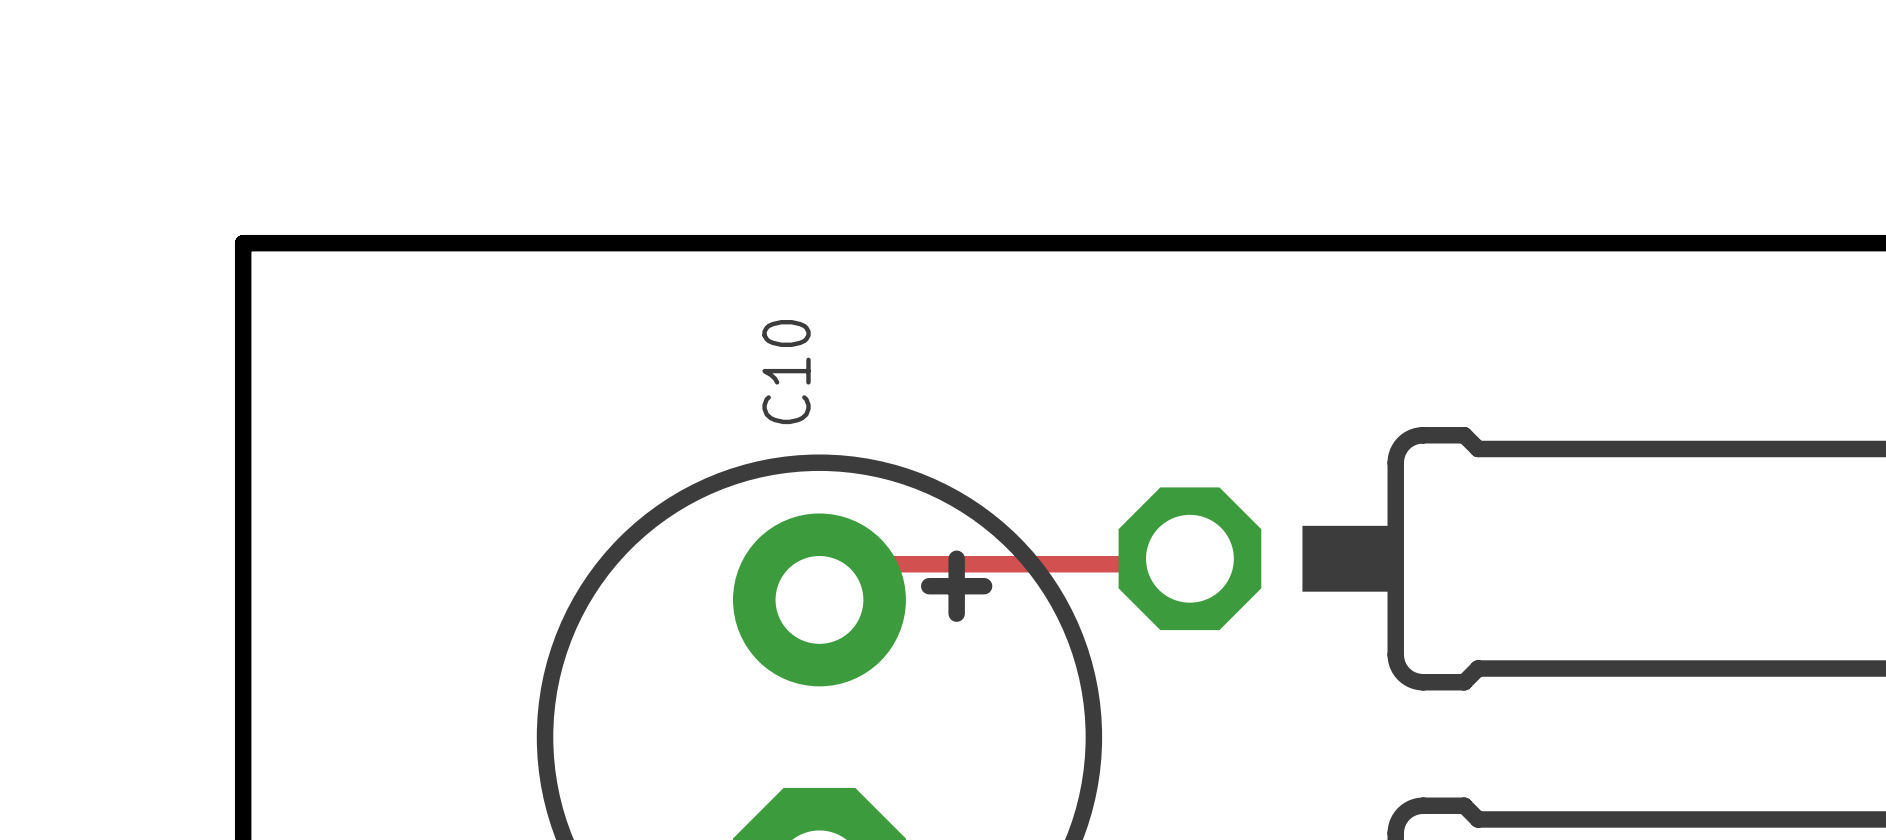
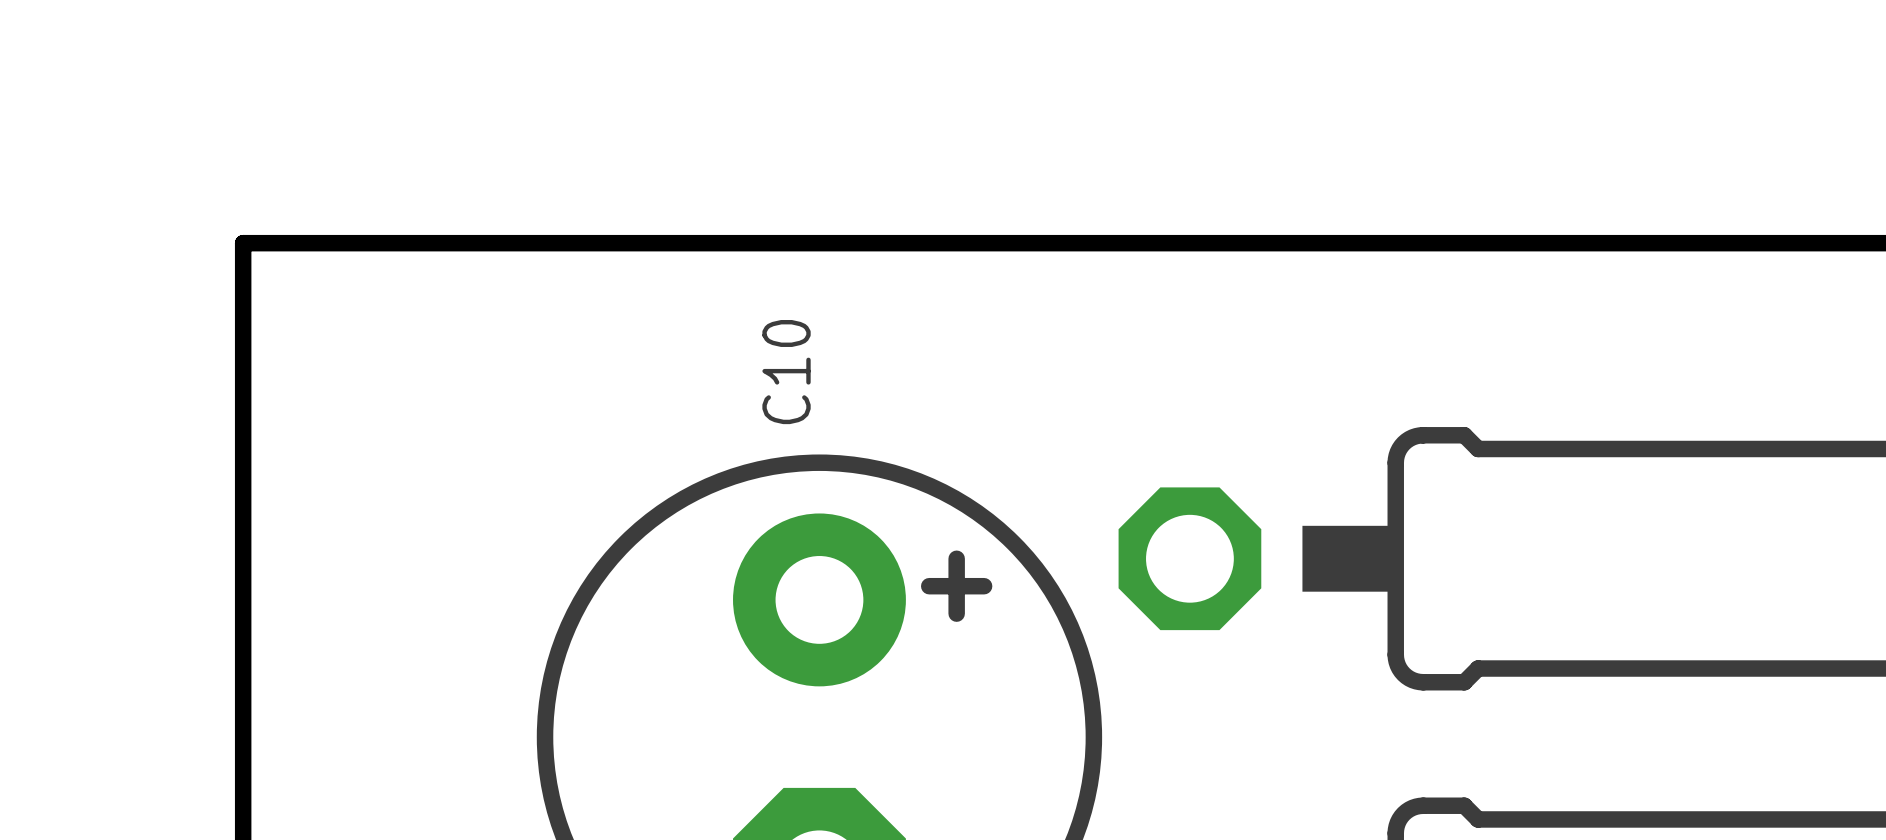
track: (1189, 558) (1189, 564) (852, 564) (819, 597) (819, 599) -> none

